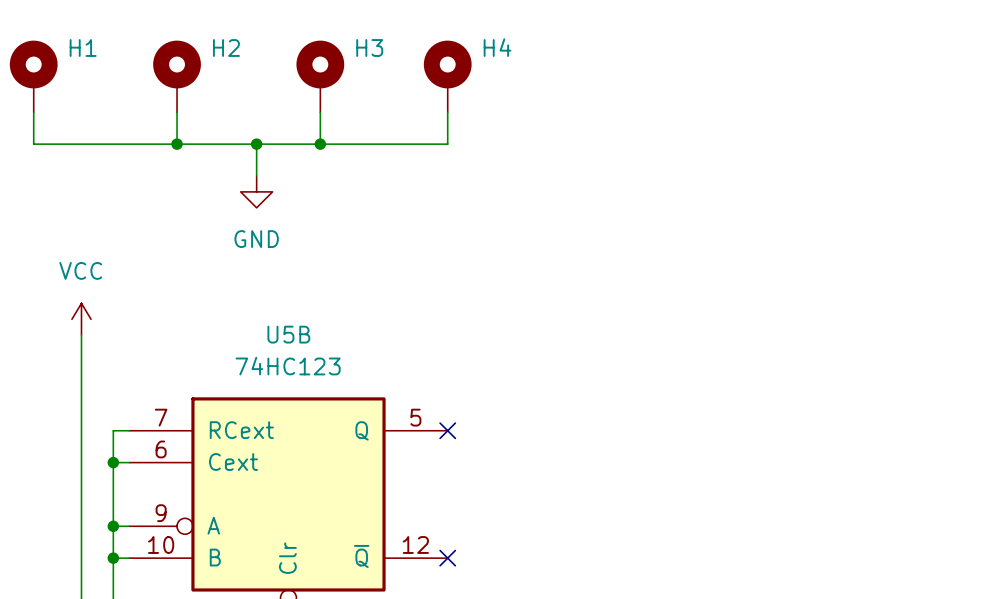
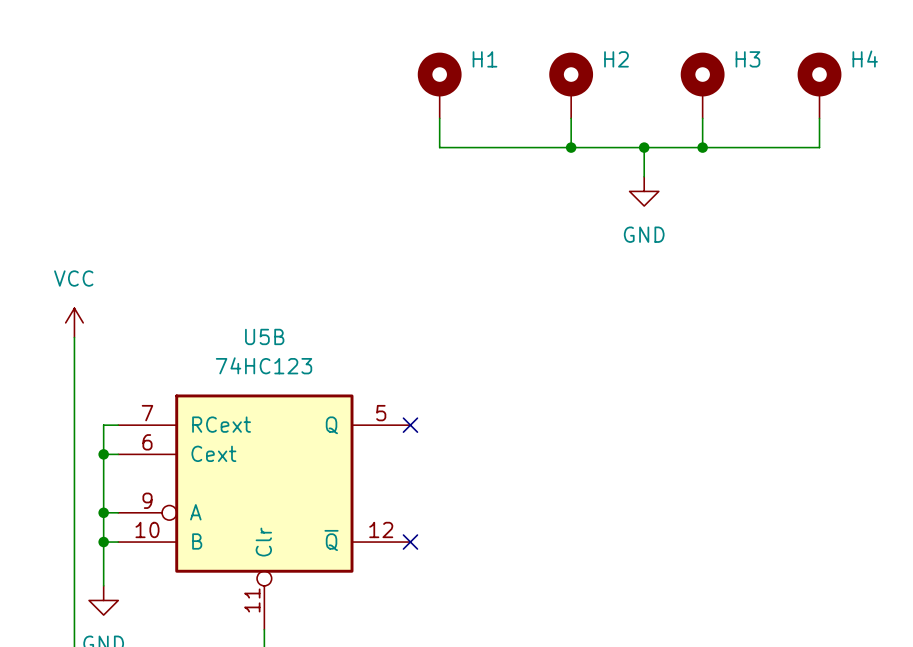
H1 position: (33, 76) -> (439, 85)
H2 position: (177, 76) -> (571, 85)
H3 position: (320, 76) -> (702, 85)
H4 position: (447, 76) -> (819, 85)
wire: none -> (439, 118) (439, 147) (819, 147) (819, 118)
wire: none -> (702, 118) (702, 147)
wire: (33, 112) (33, 144) (447, 144) (447, 112) -> none
wire: (177, 112) (177, 144) -> none
wire: (320, 112) (320, 144) -> (571, 118) (571, 147)
junction: none -> (571, 147)
wire: none -> (644, 147) (644, 176)
junction: none -> (644, 147)
junction: none -> (702, 147)
junction: (177, 144) -> none
wire: (256, 144) (256, 175) -> none
junction: (256, 144) -> none
junction: (320, 144) -> none
power symbol: none -> GND (644, 191)
power symbol: GND (256, 191) -> none

